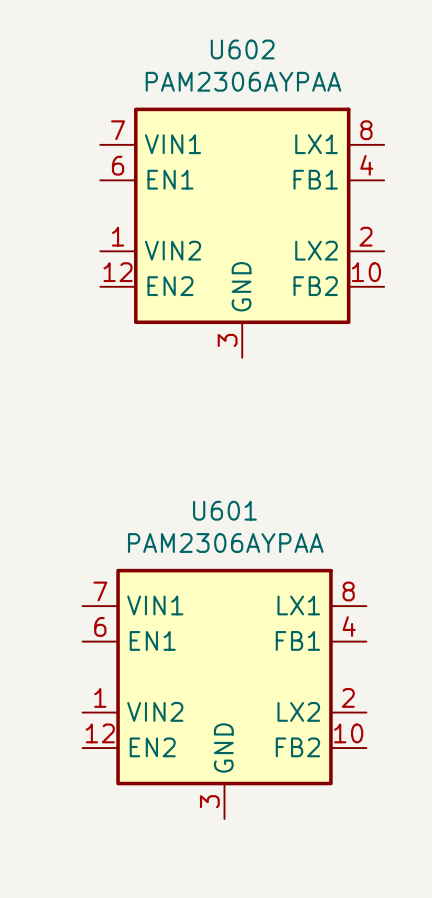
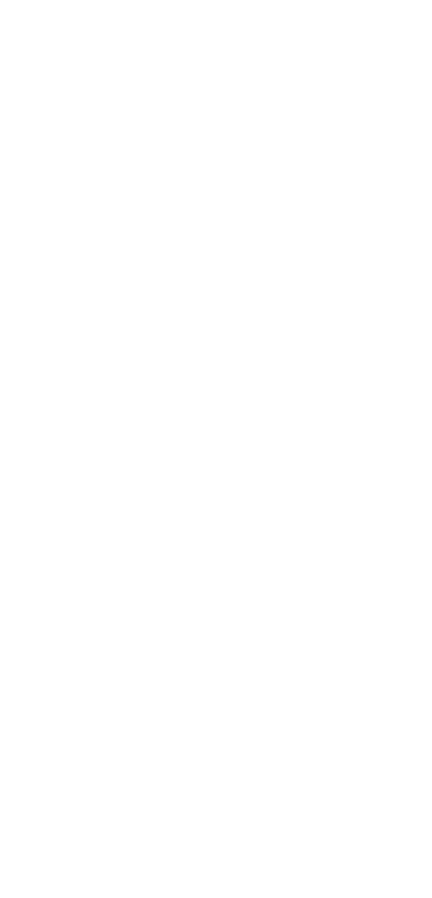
U602: PAM2306AYPAA (242, 232) -> none
U601: PAM2306AYPAA (224, 693) -> none

